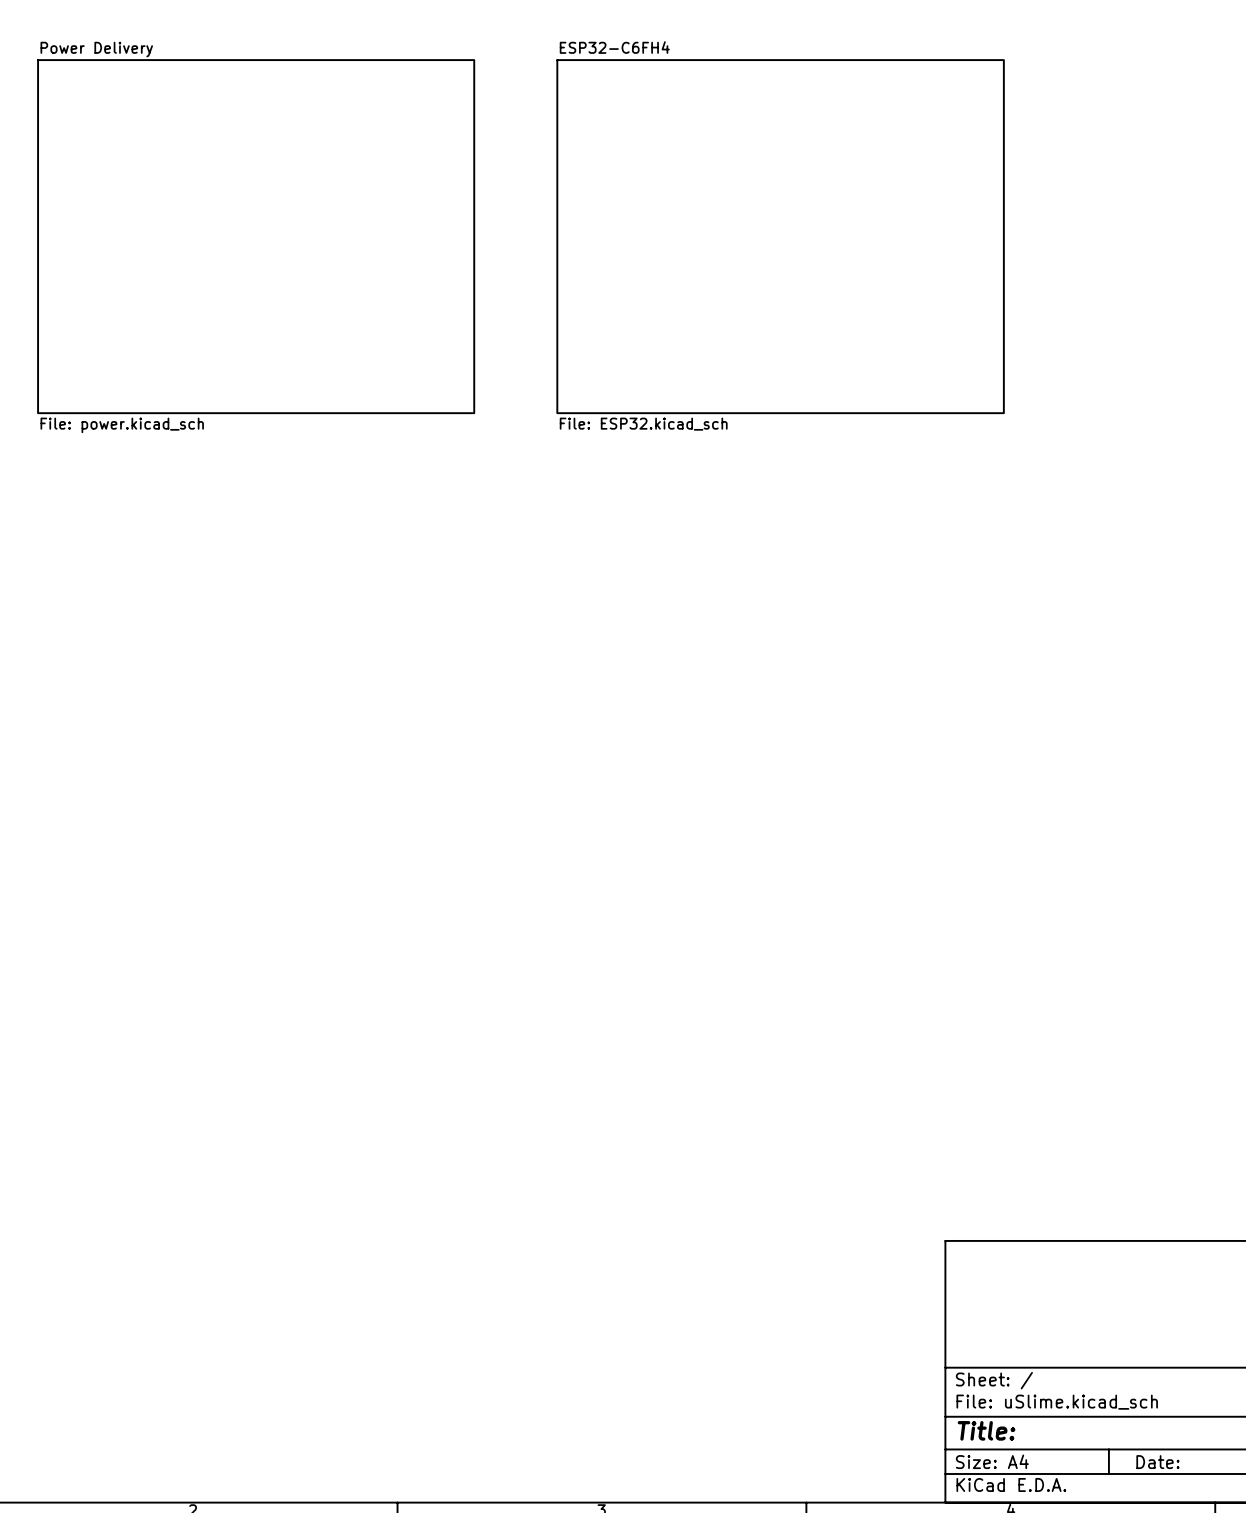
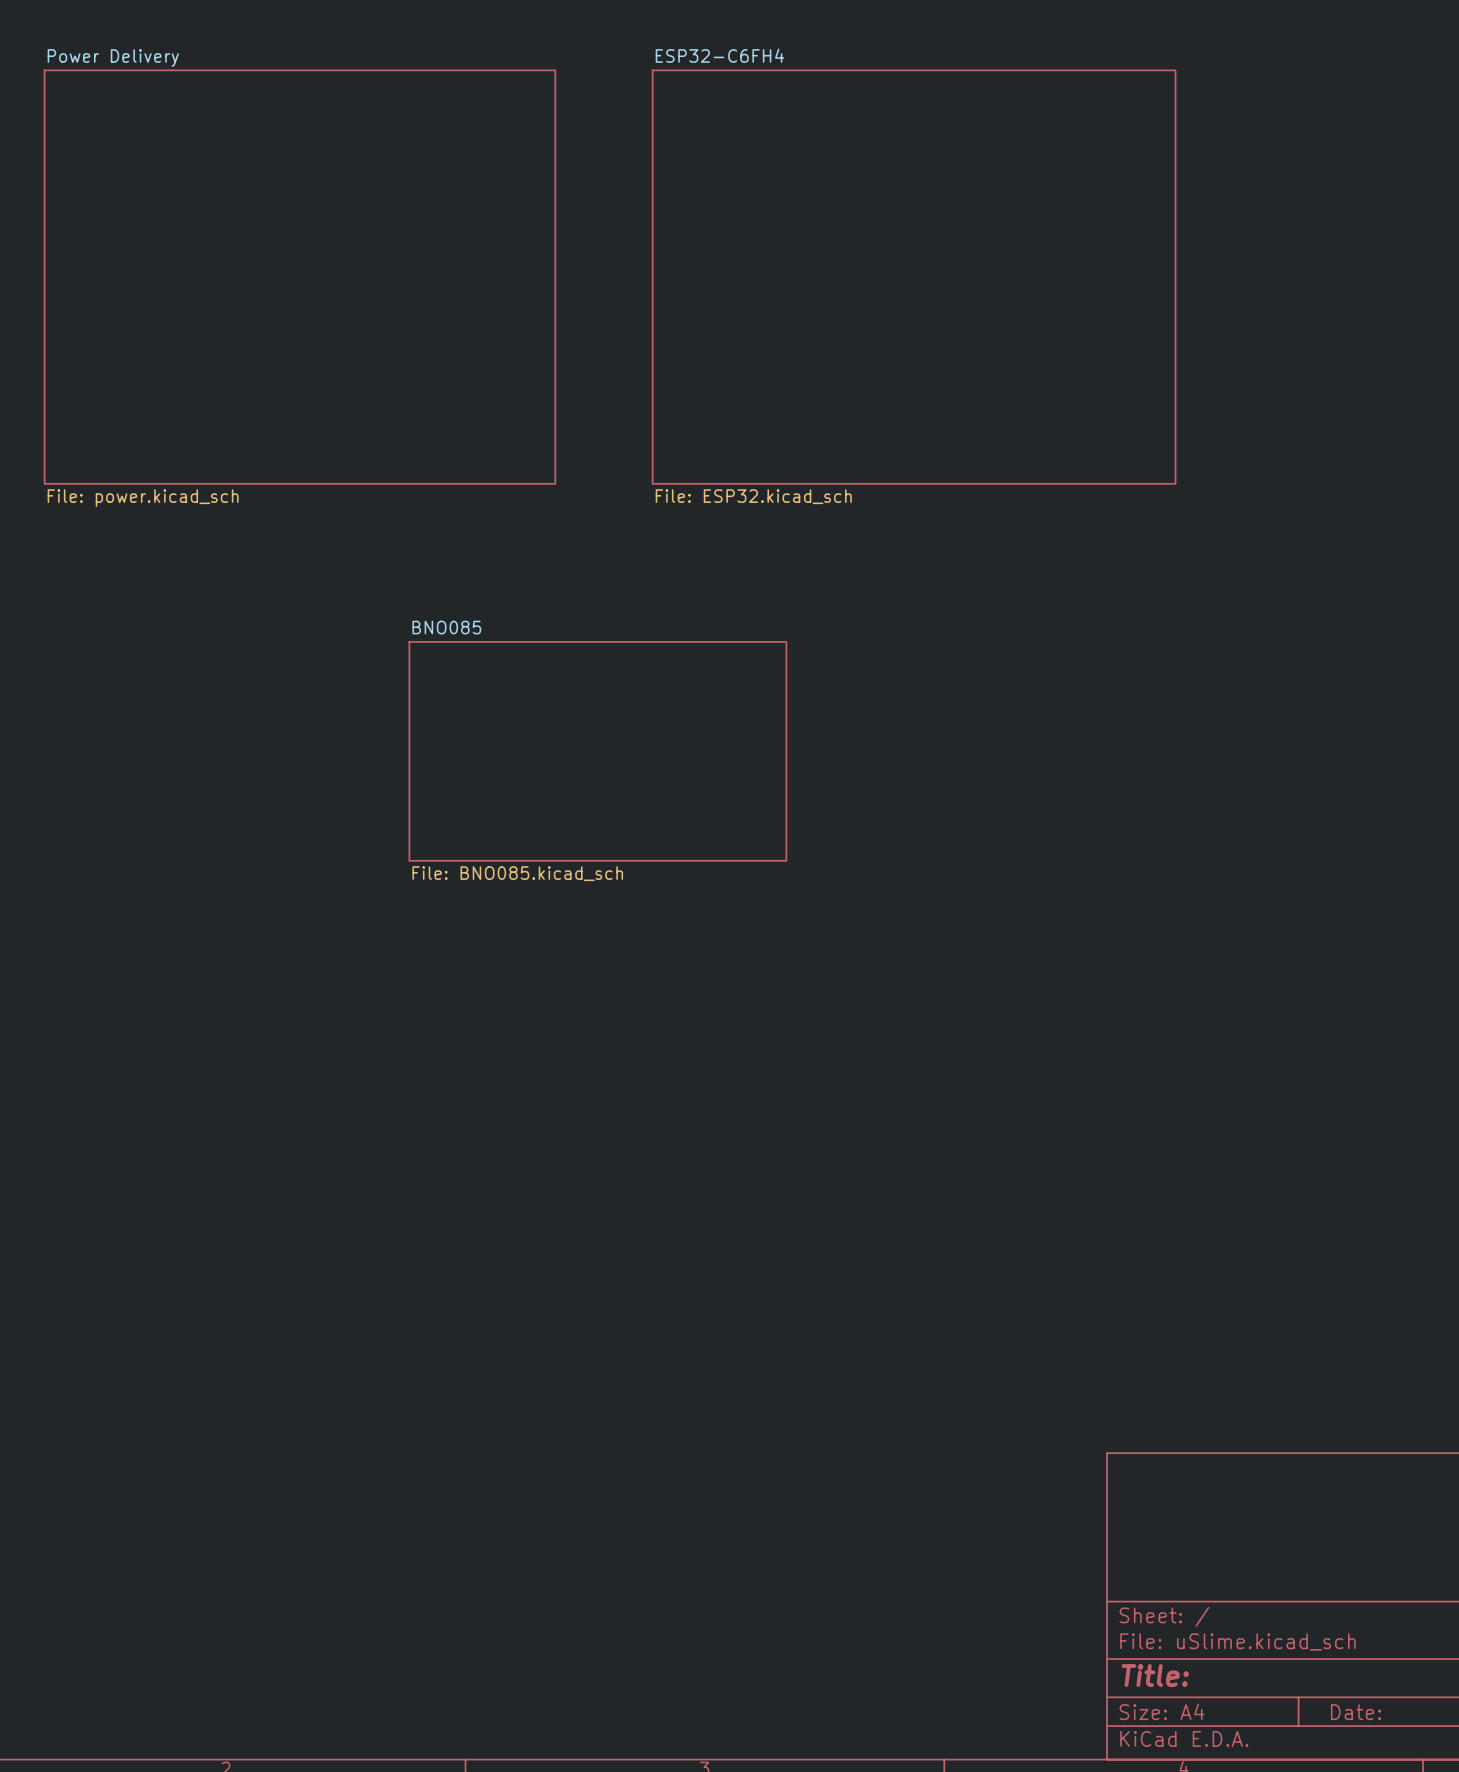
sheet BNO085: none -> File: BNO085.kicad_sch (597, 751)

